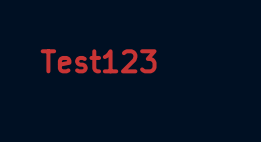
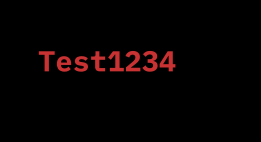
text: Test123 (98, 61) -> Test1234 (107, 61)

